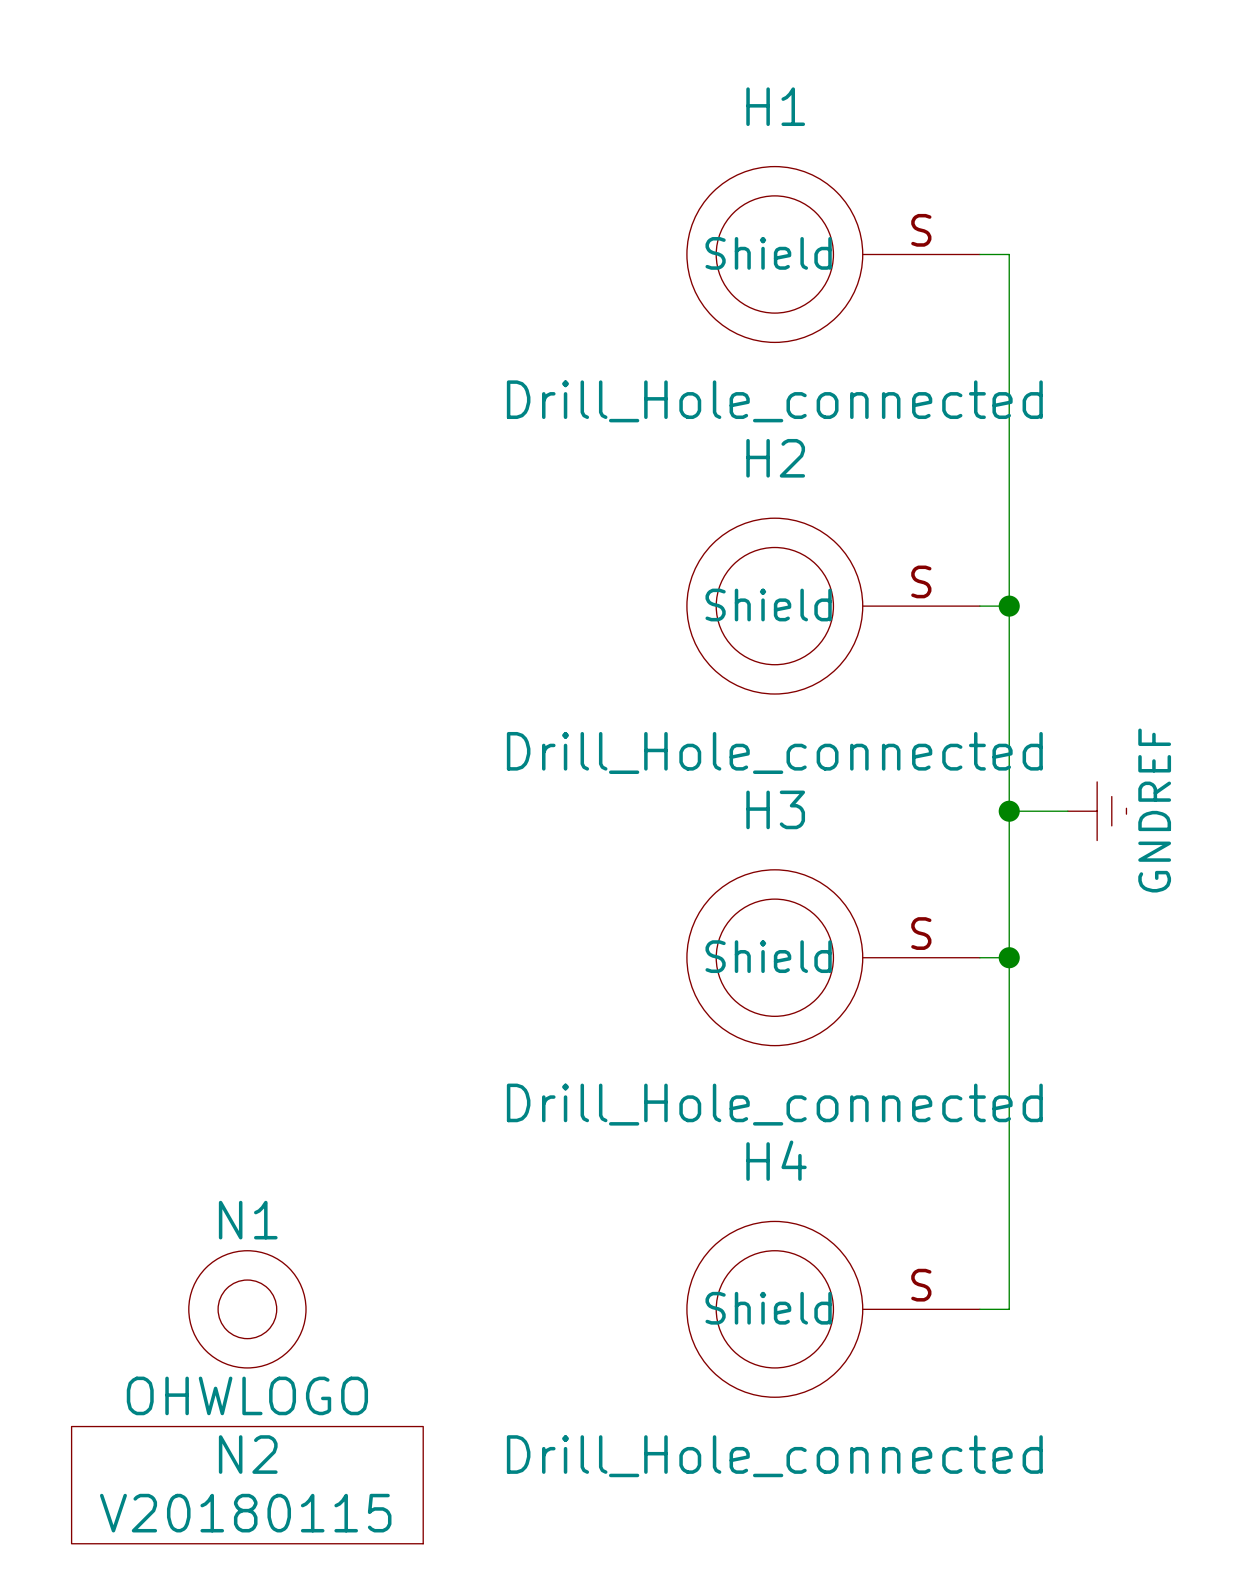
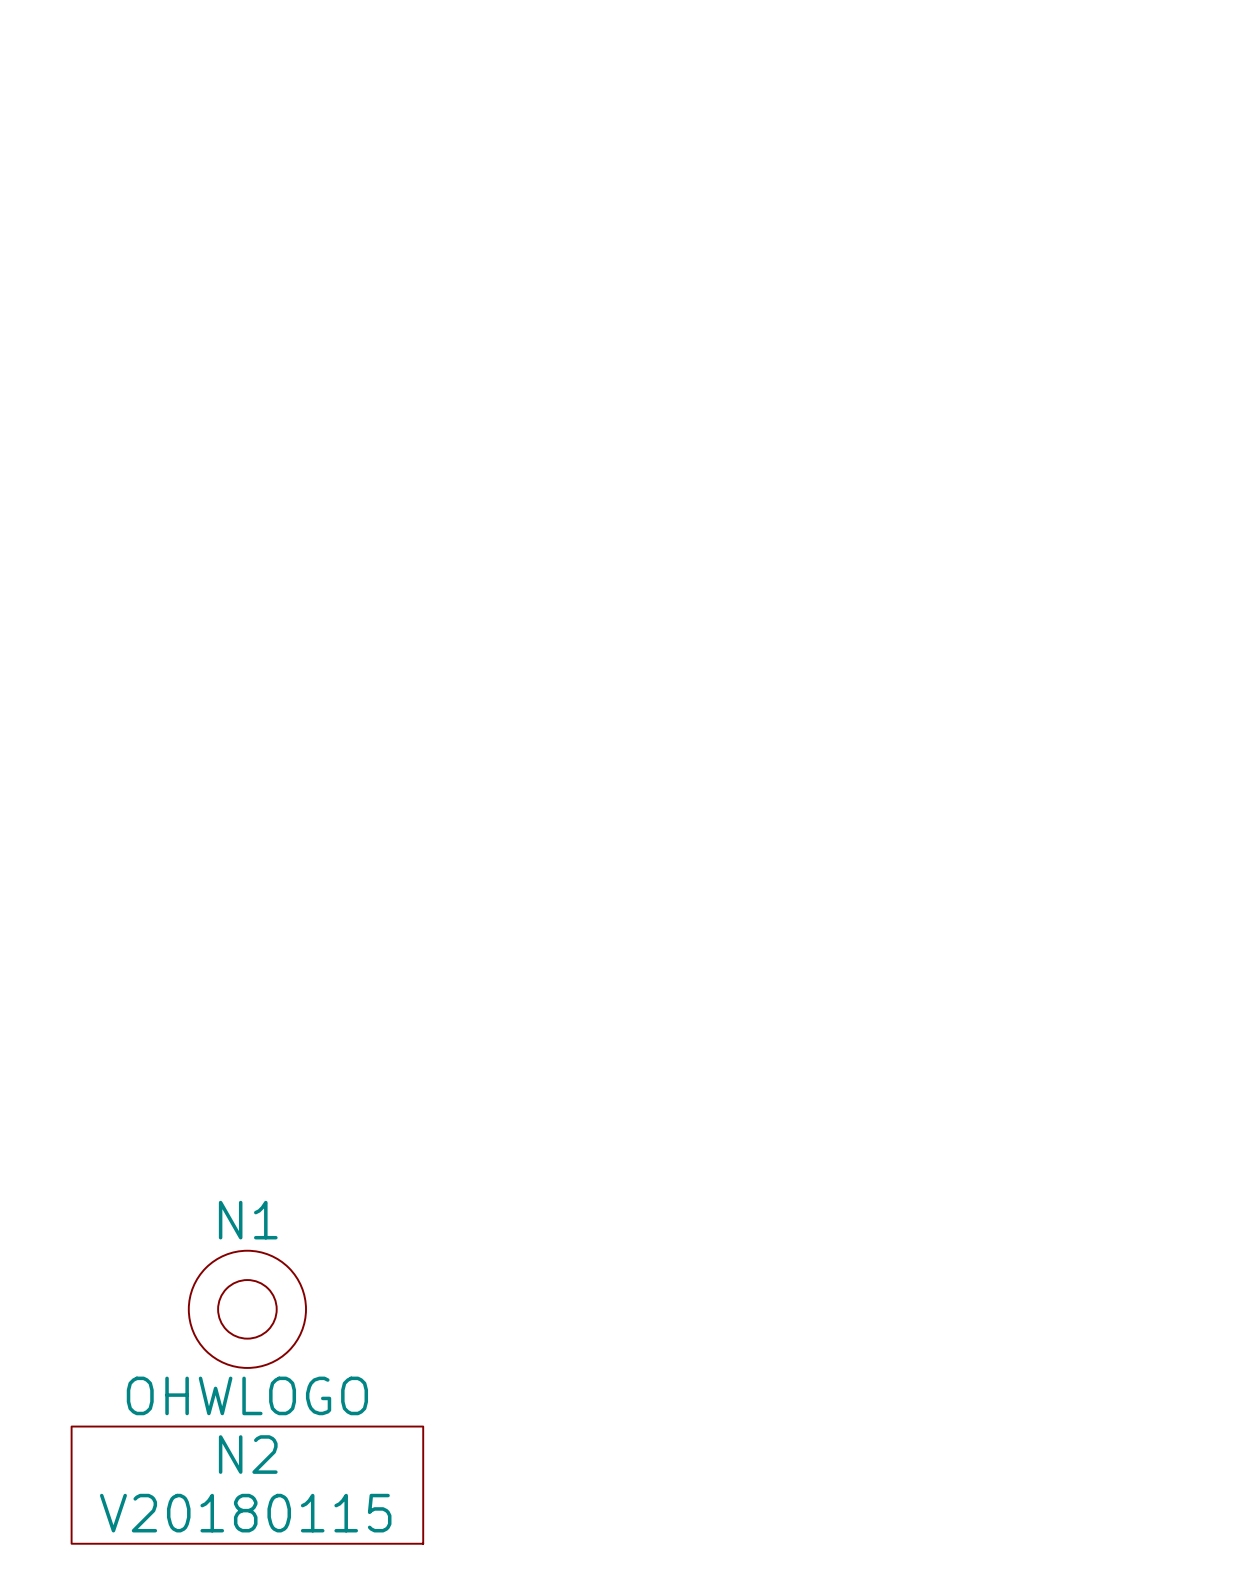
H1: Drill_Hole_connected (833, 254) -> none
wire: (979, 254) (1009, 254) (1009, 1309) (979, 1309) -> none
H2: Drill_Hole_connected (833, 606) -> none
wire: (979, 606) (1009, 606) -> none
junction: (1009, 606) -> none
wire: (1009, 811) (1067, 811) -> none
junction: (1009, 811) -> none
power symbol: GNDREF (1097, 811) -> none
H3: Drill_Hole_connected (833, 957) -> none
wire: (979, 957) (1009, 957) -> none
junction: (1009, 957) -> none
H4: Drill_Hole_connected (833, 1309) -> none

